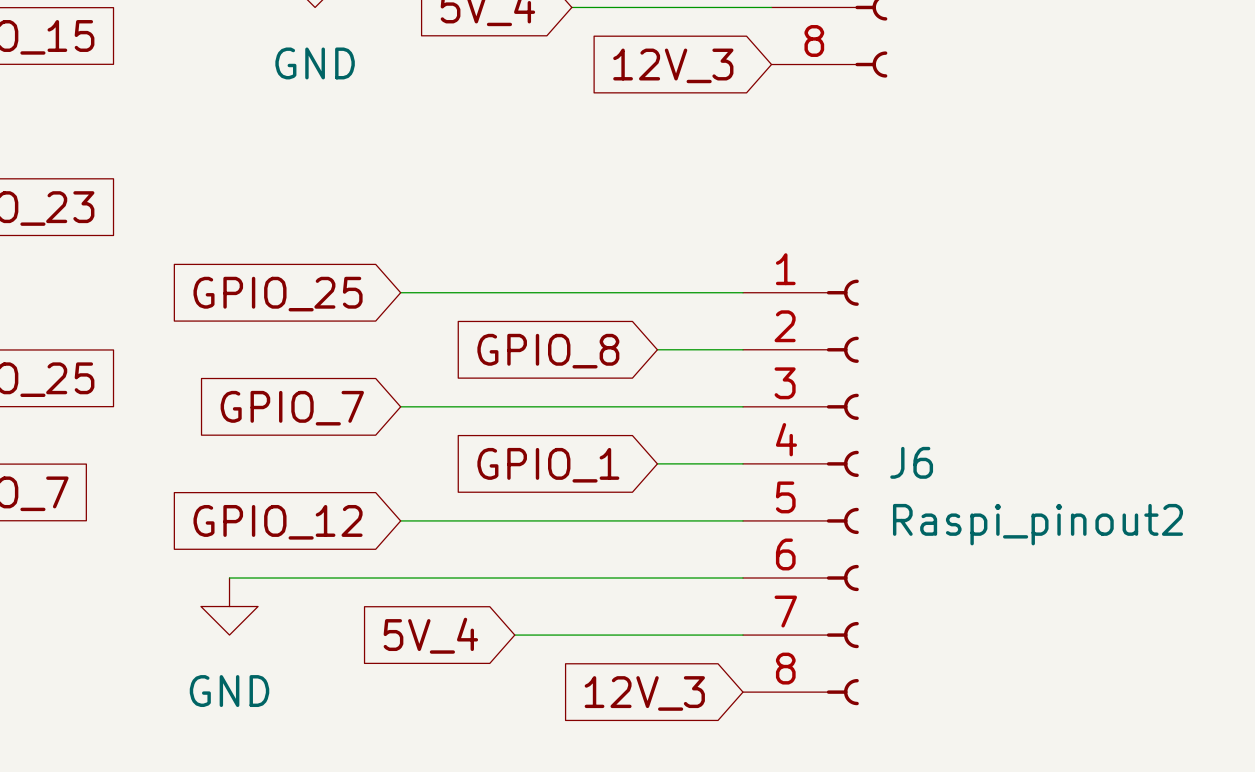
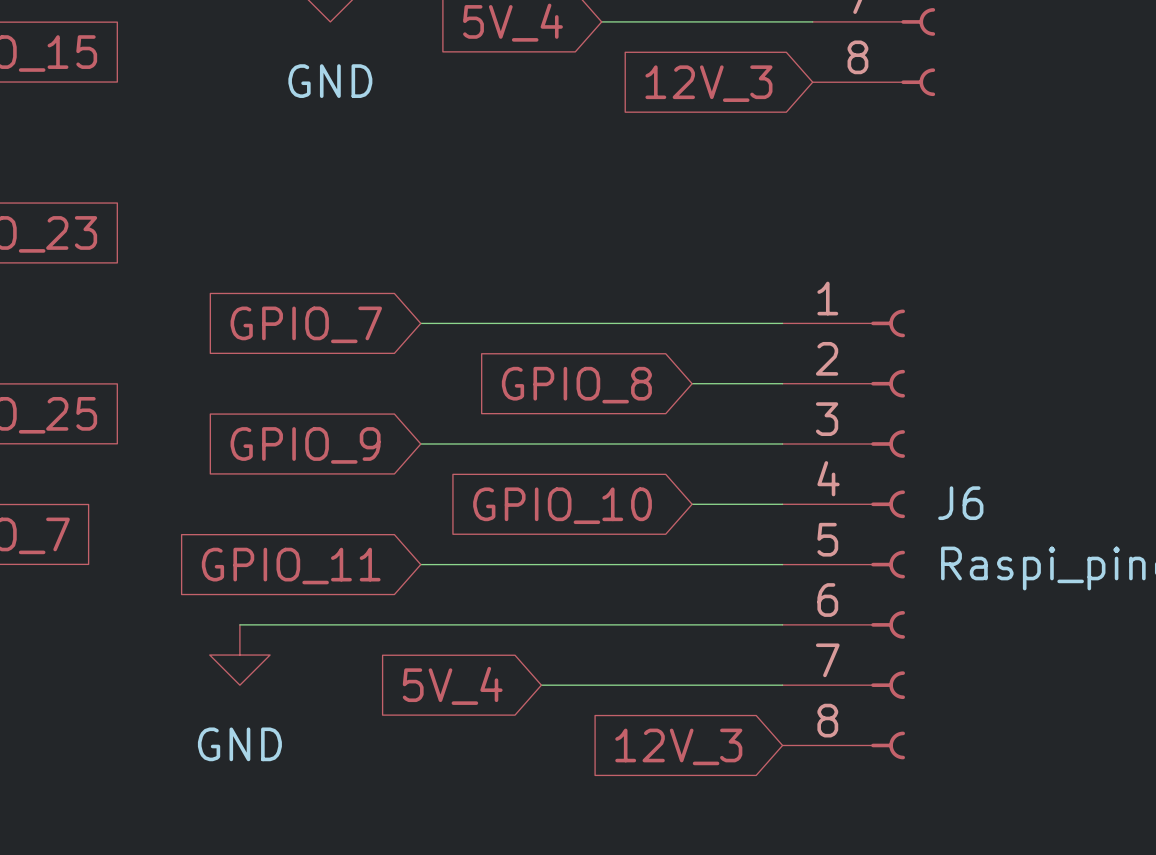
global label: GPIO_25 (278, 294) -> GPIO_7 (306, 324)
global label: GPIO_7 (292, 408) -> GPIO_9 (305, 445)
global label: GPIO_1 (548, 465) -> GPIO_10 (562, 505)
global label: GPIO_12 (278, 522) -> GPIO_11 (291, 566)

